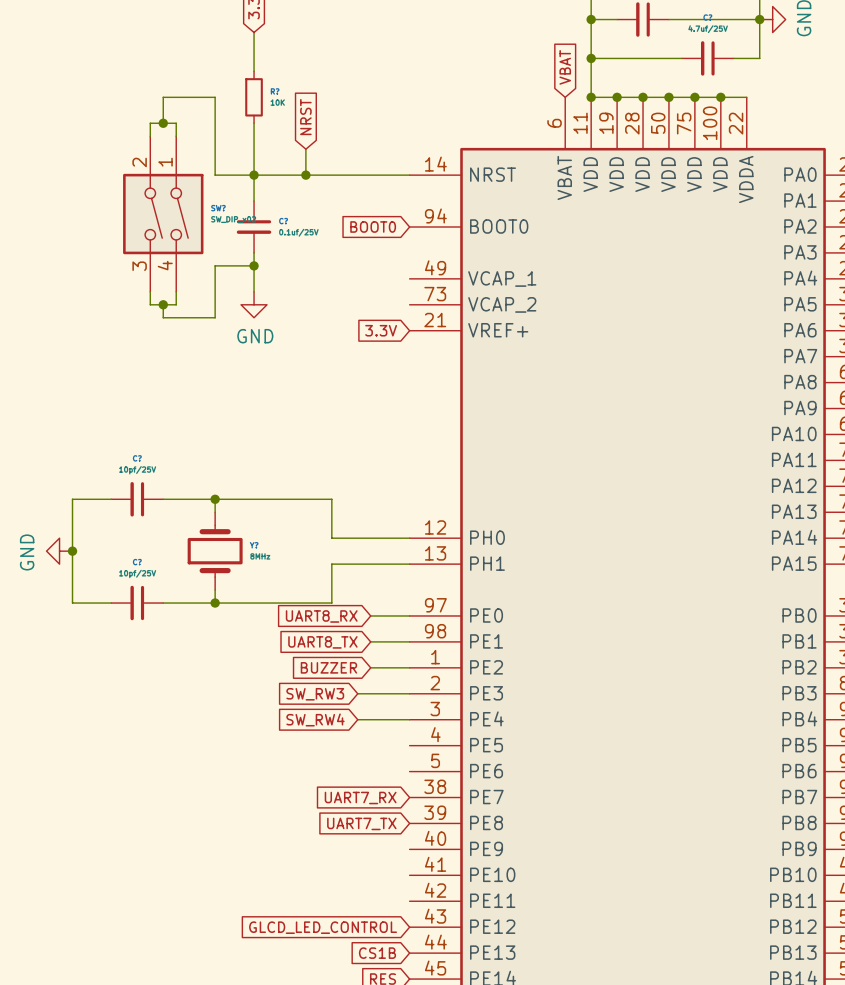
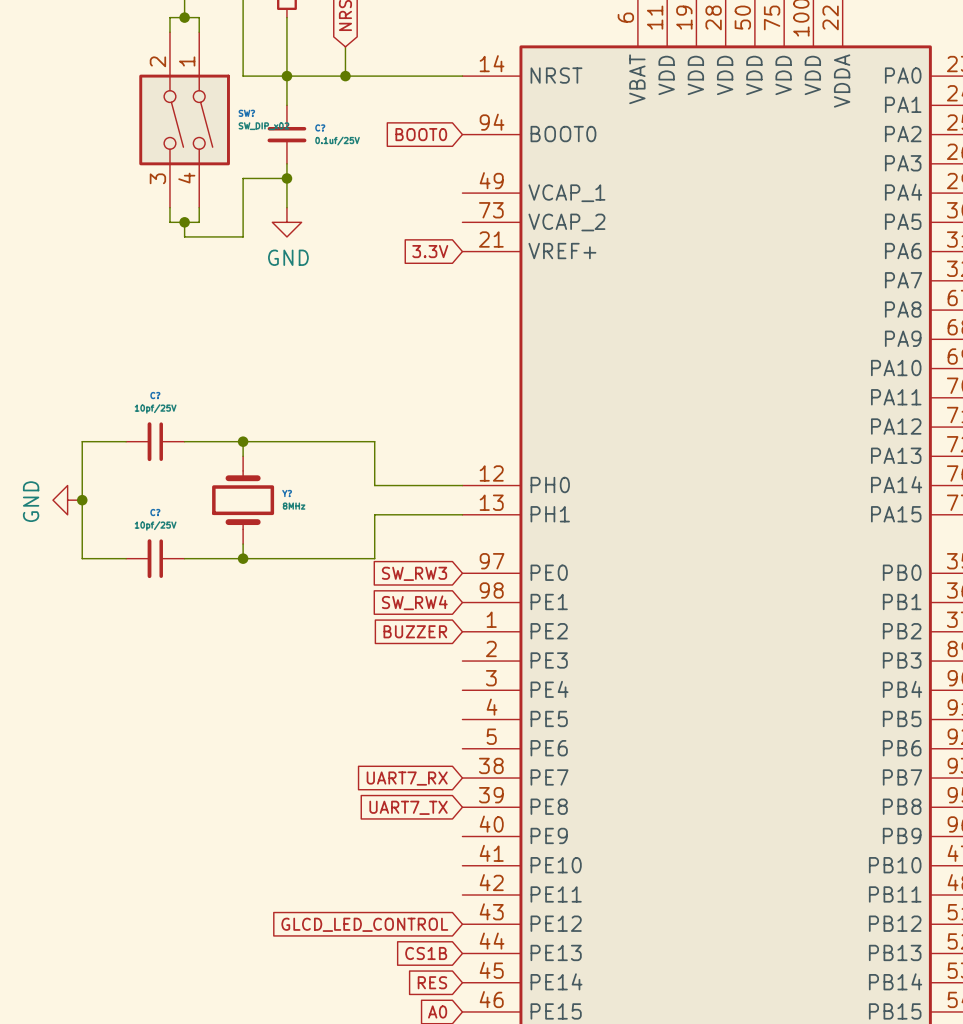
wire: (370, 615) (409, 615) -> none
global label: UART8_RX (321, 616) -> none
wire: (370, 641) (409, 641) -> none
global label: UART8_TX (322, 642) -> none
global label position: BUZZER (328, 667) -> BUZZER (415, 631)
wire: (370, 667) (409, 667) -> none
wire: (357, 693) (409, 693) -> none
global label position: SW_RW3 (315, 694) -> SW_RW3 (414, 573)
global label position: SW_RW4 (315, 719) -> SW_RW4 (414, 602)
wire: (357, 719) (409, 719) -> none

